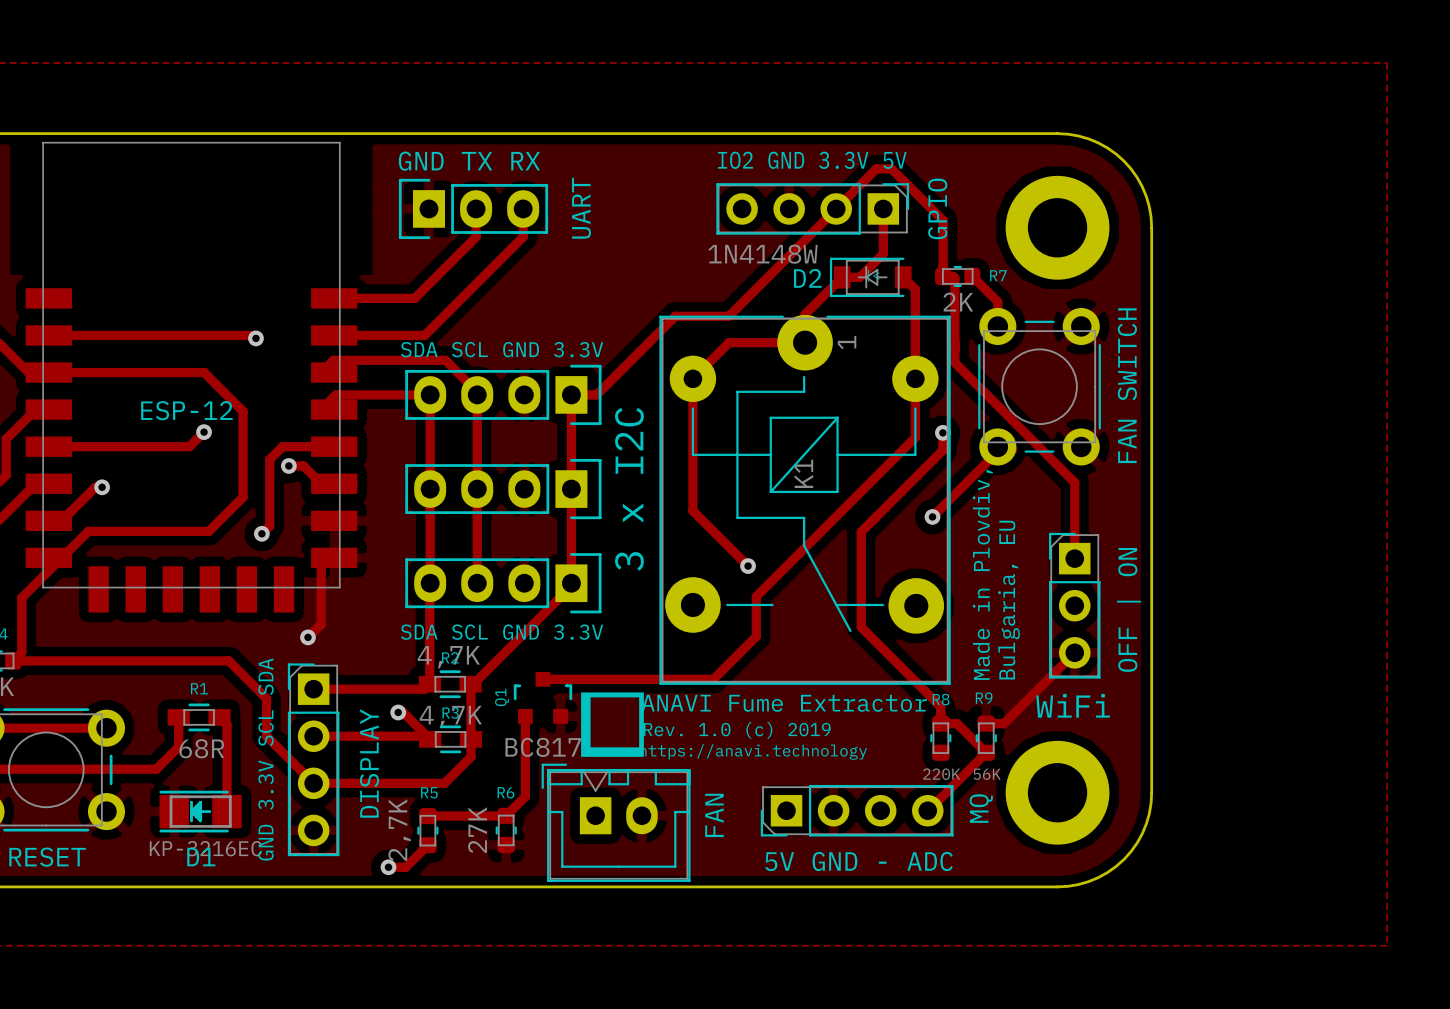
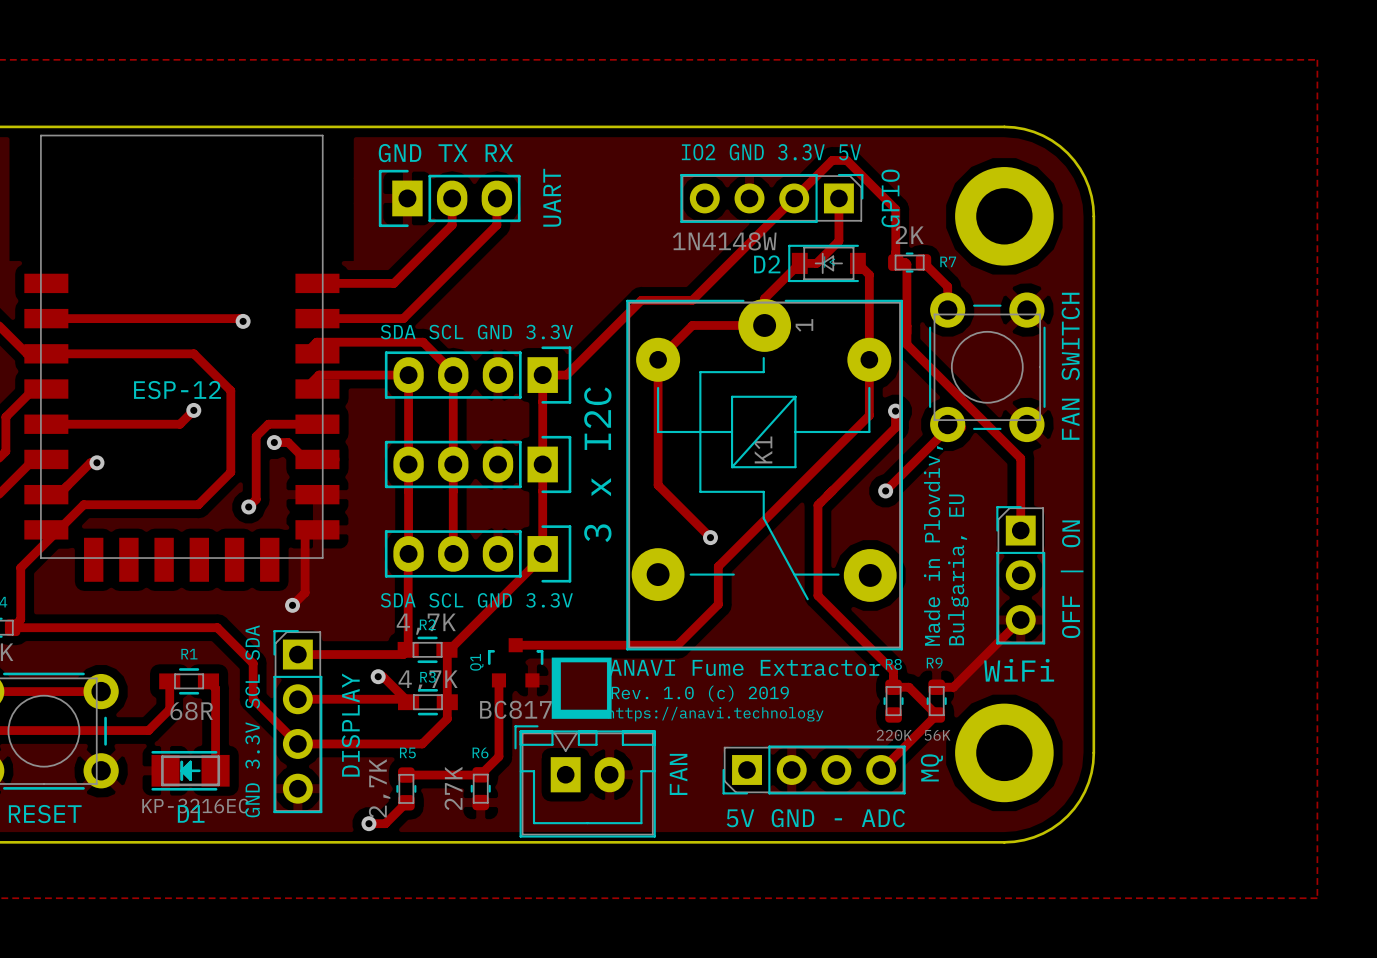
R7 value position: 2K (958, 302) -> 2K (909, 235)

